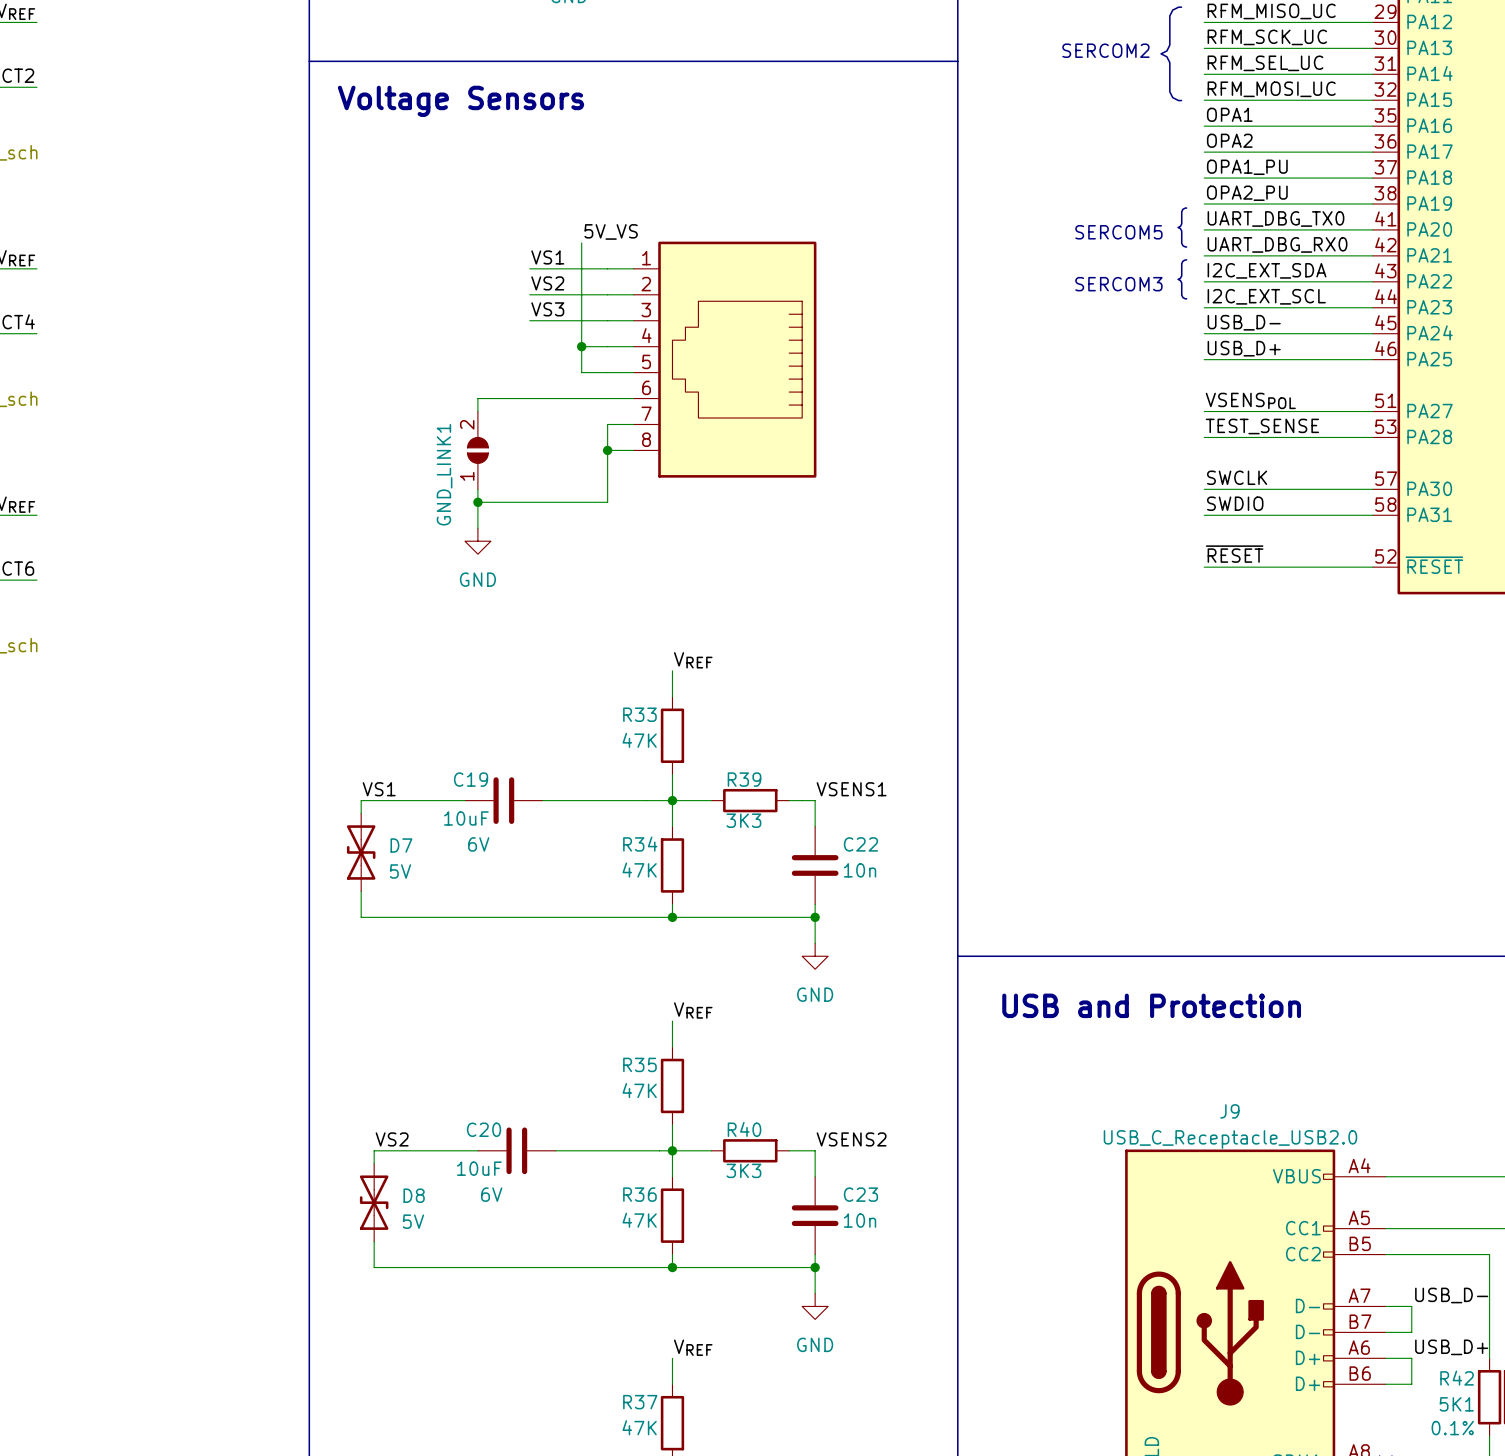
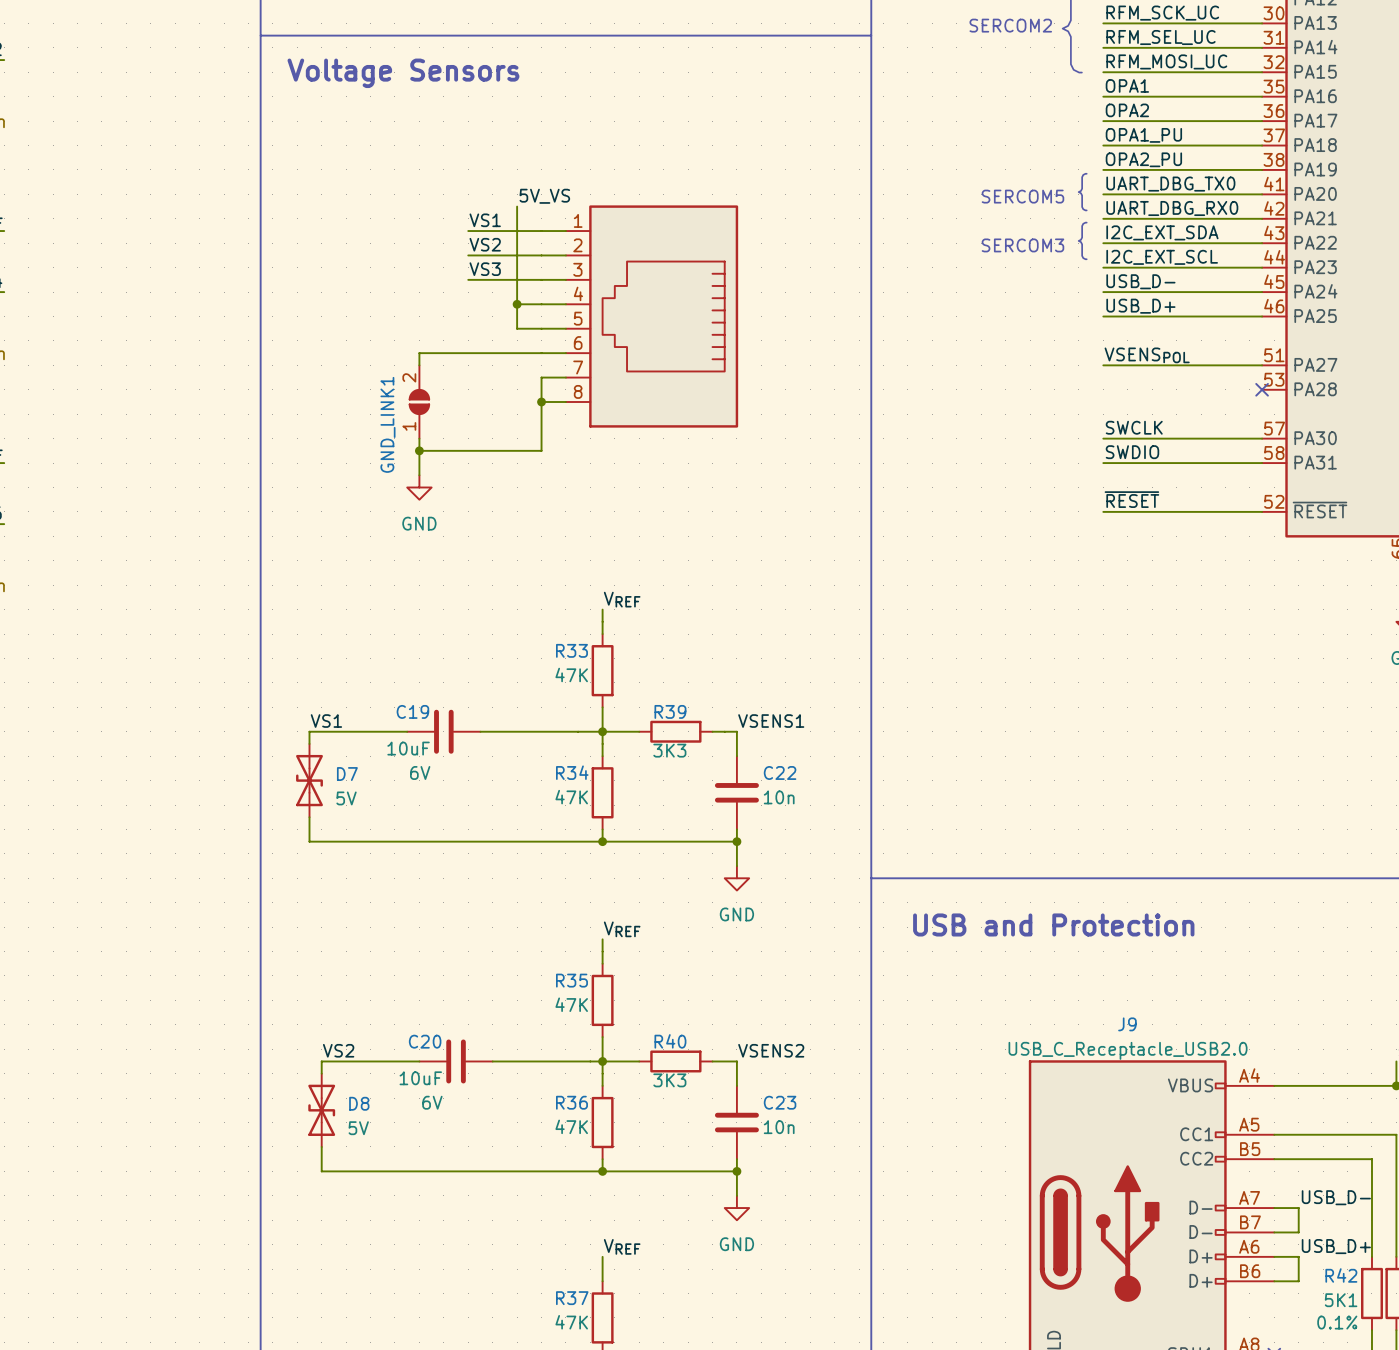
label: TEST_SENSE (1262, 426) -> none
wire: (1204, 437) (1372, 437) -> none
no-connect mark: none -> (1262, 389)

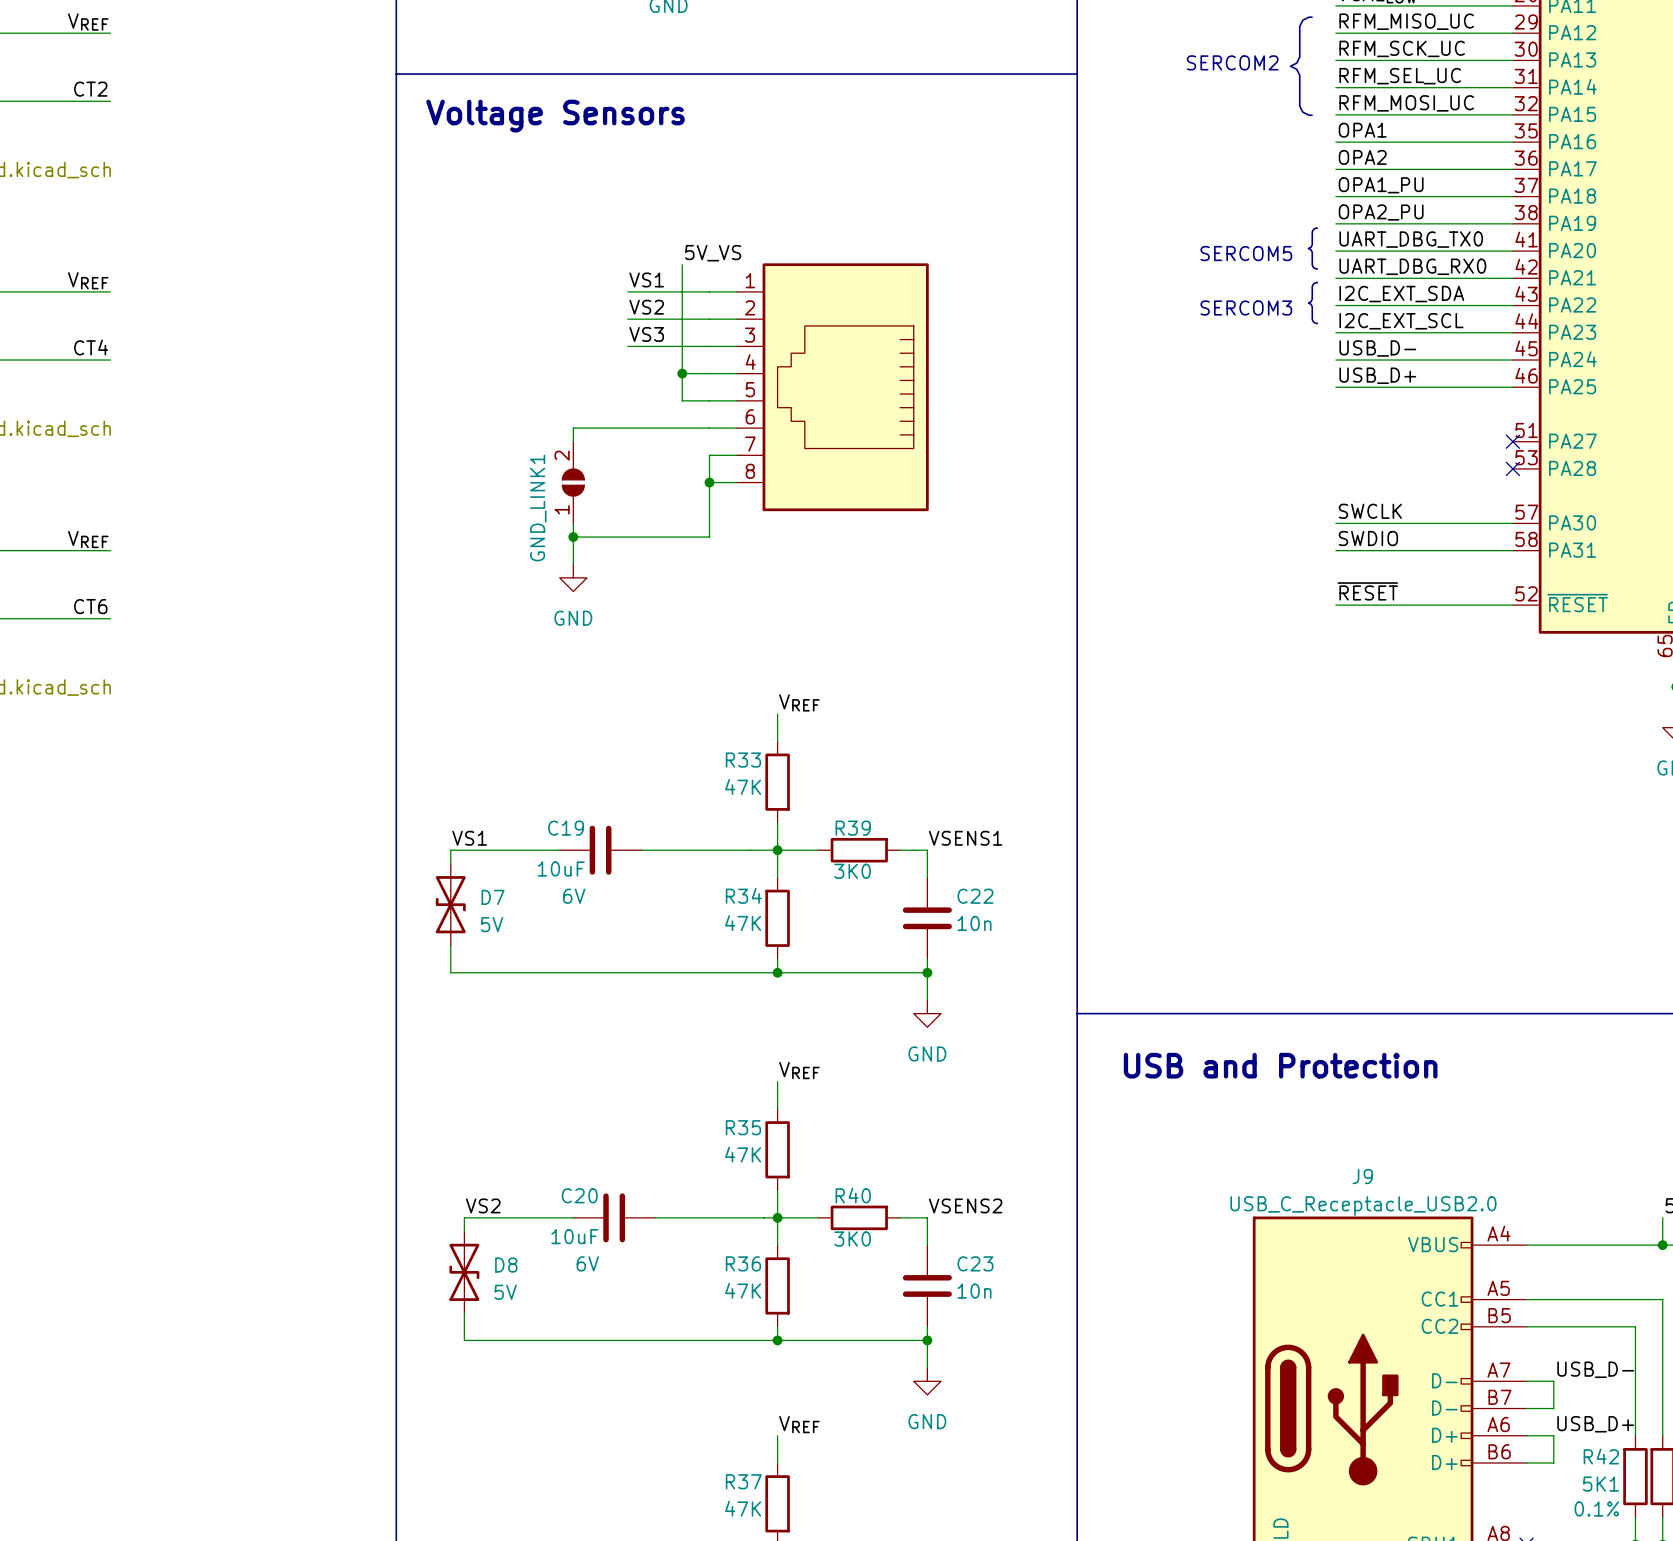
label: VSENSPOL (1147, 355) -> none
wire: (1103, 365) (1262, 365) -> none
no-connect mark: none -> (1512, 441)
R39 value: 3K3 (669, 750) -> 3K0 (852, 871)
R40 value: 3K3 (669, 1080) -> 3K0 (852, 1238)

